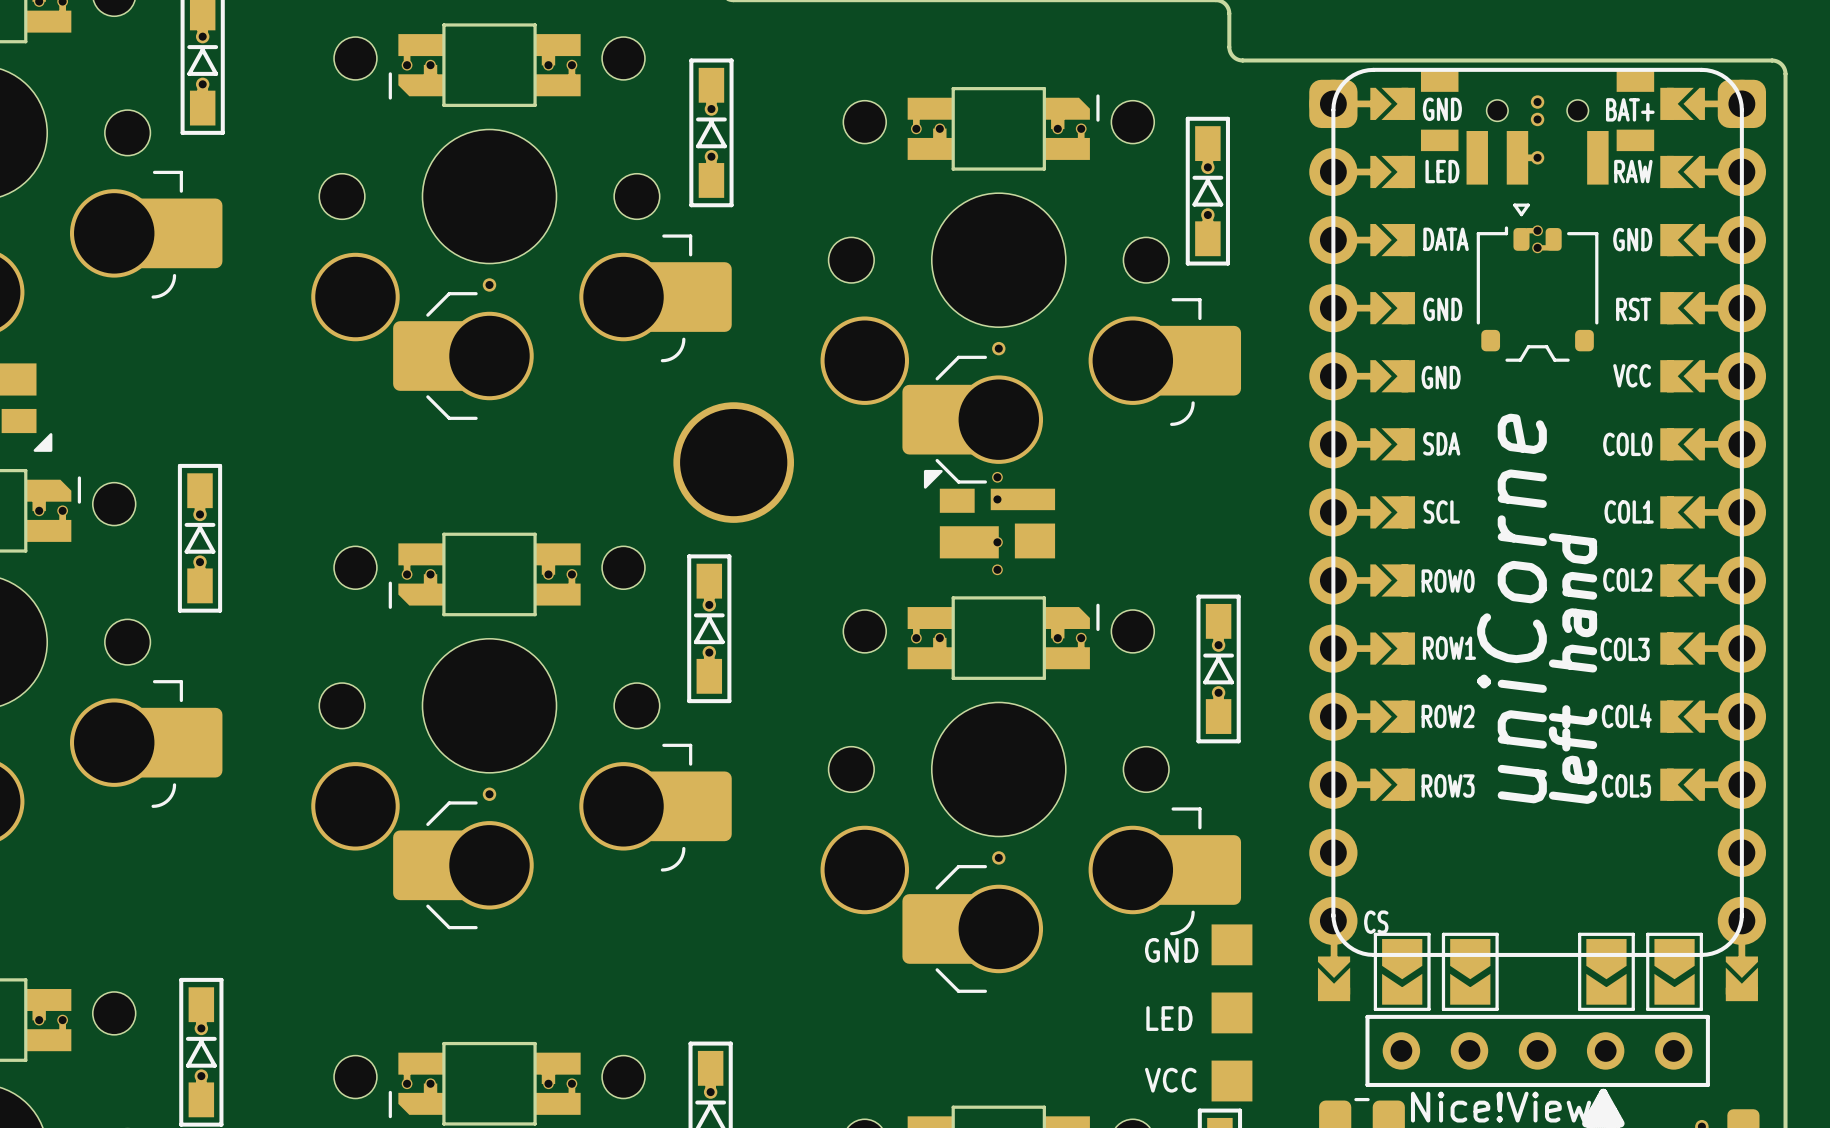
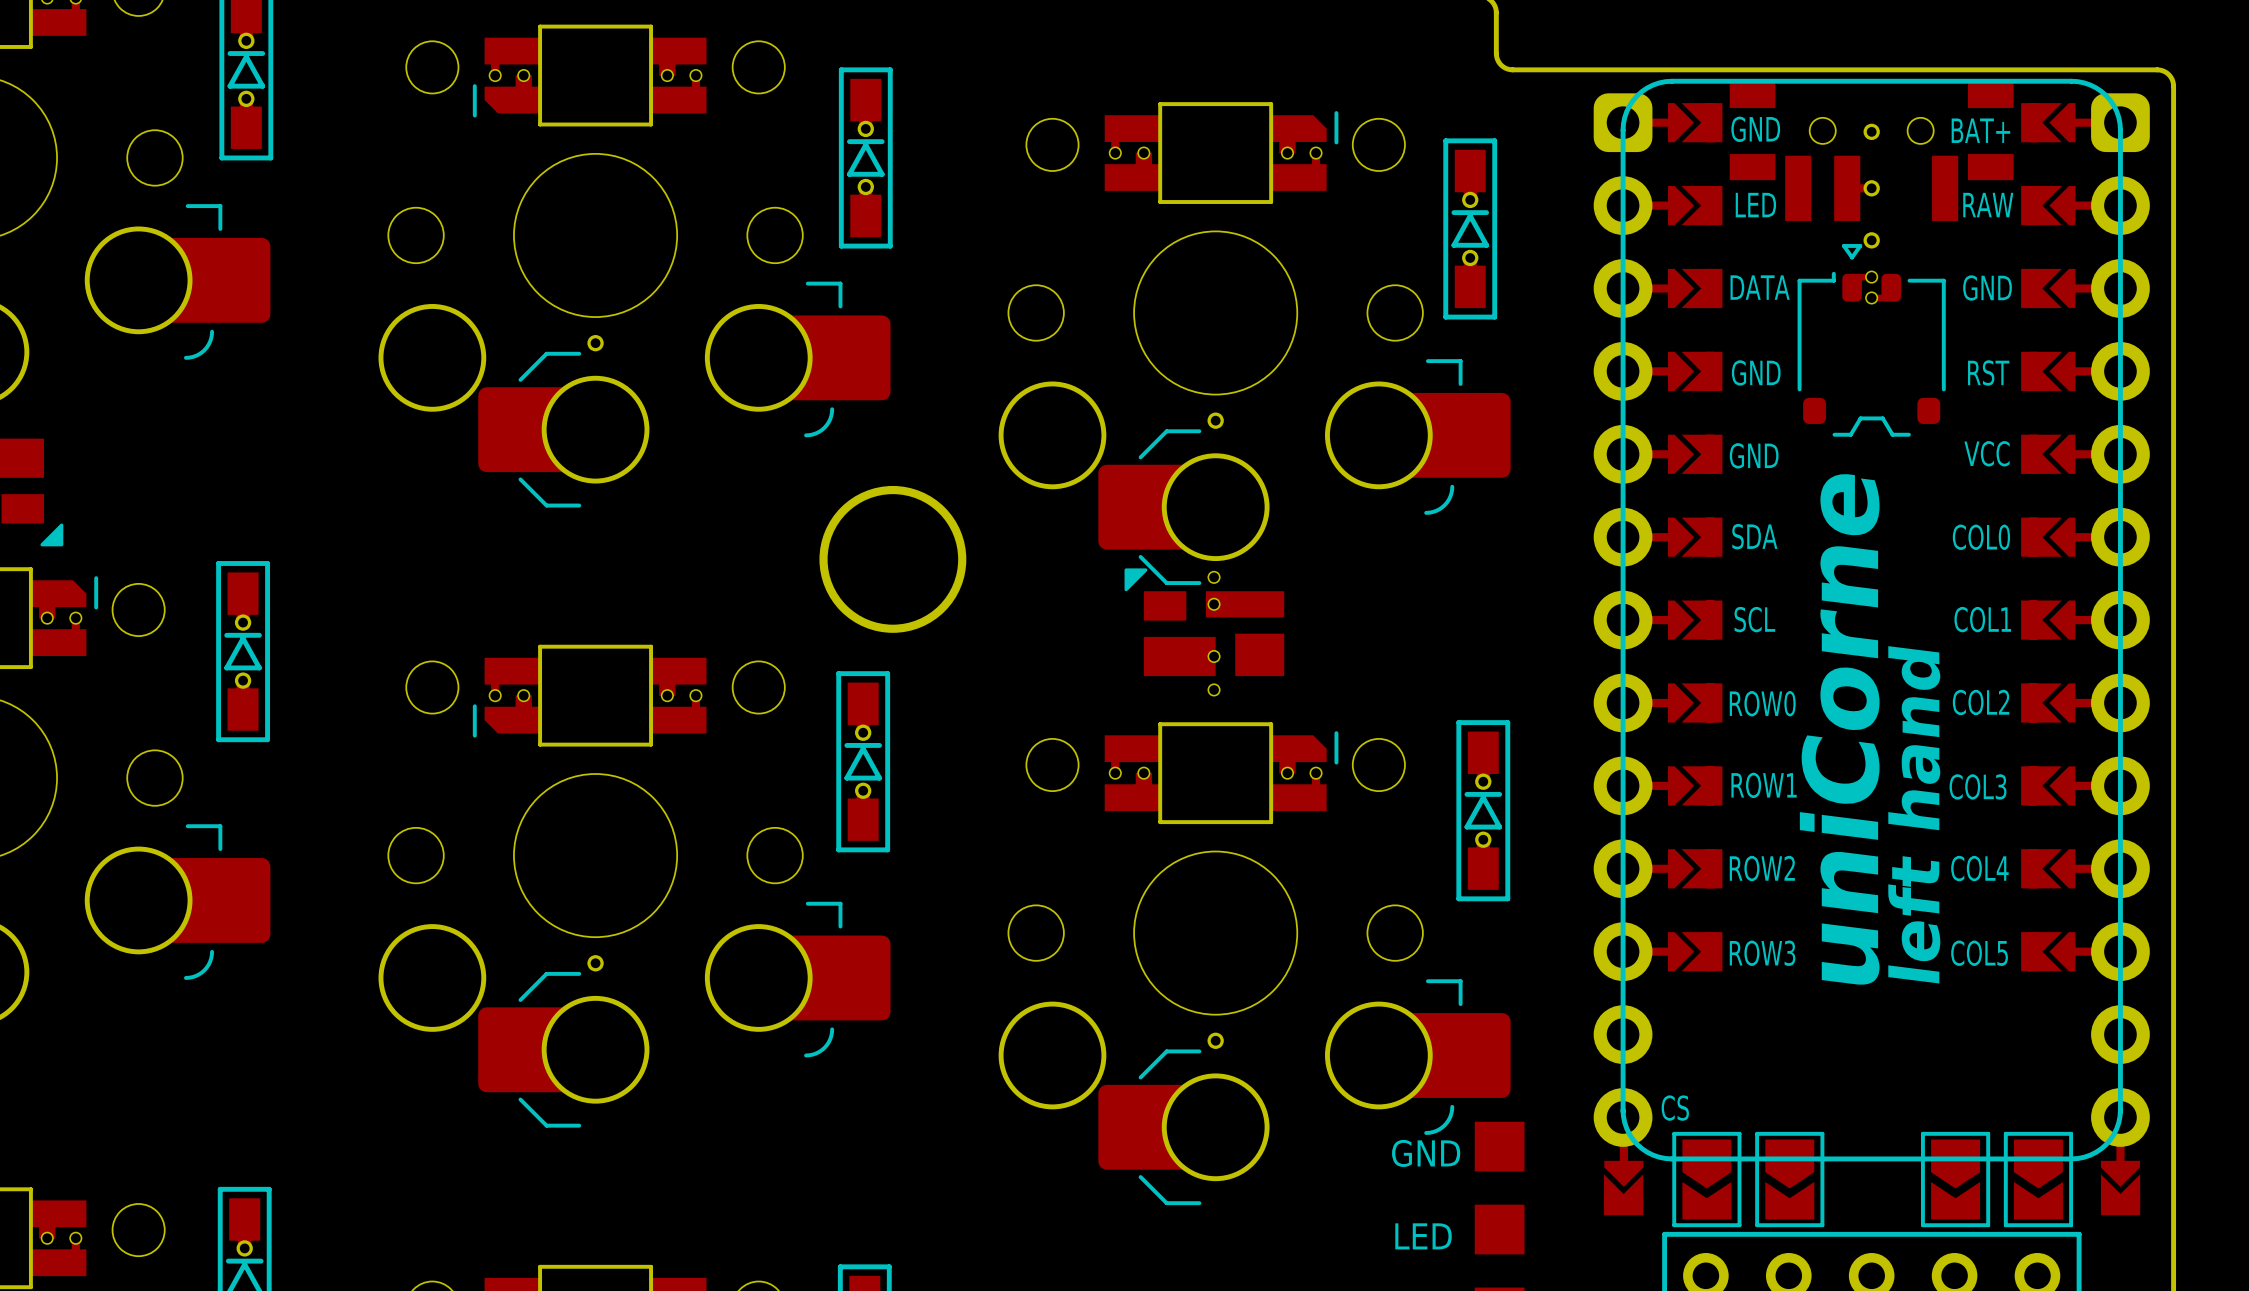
part footprint: [1309, 67, 1767, 1002] -> [1593, 78, 2150, 1216]
part footprint: [1420, 70, 1655, 185] -> [1729, 81, 2014, 249]

